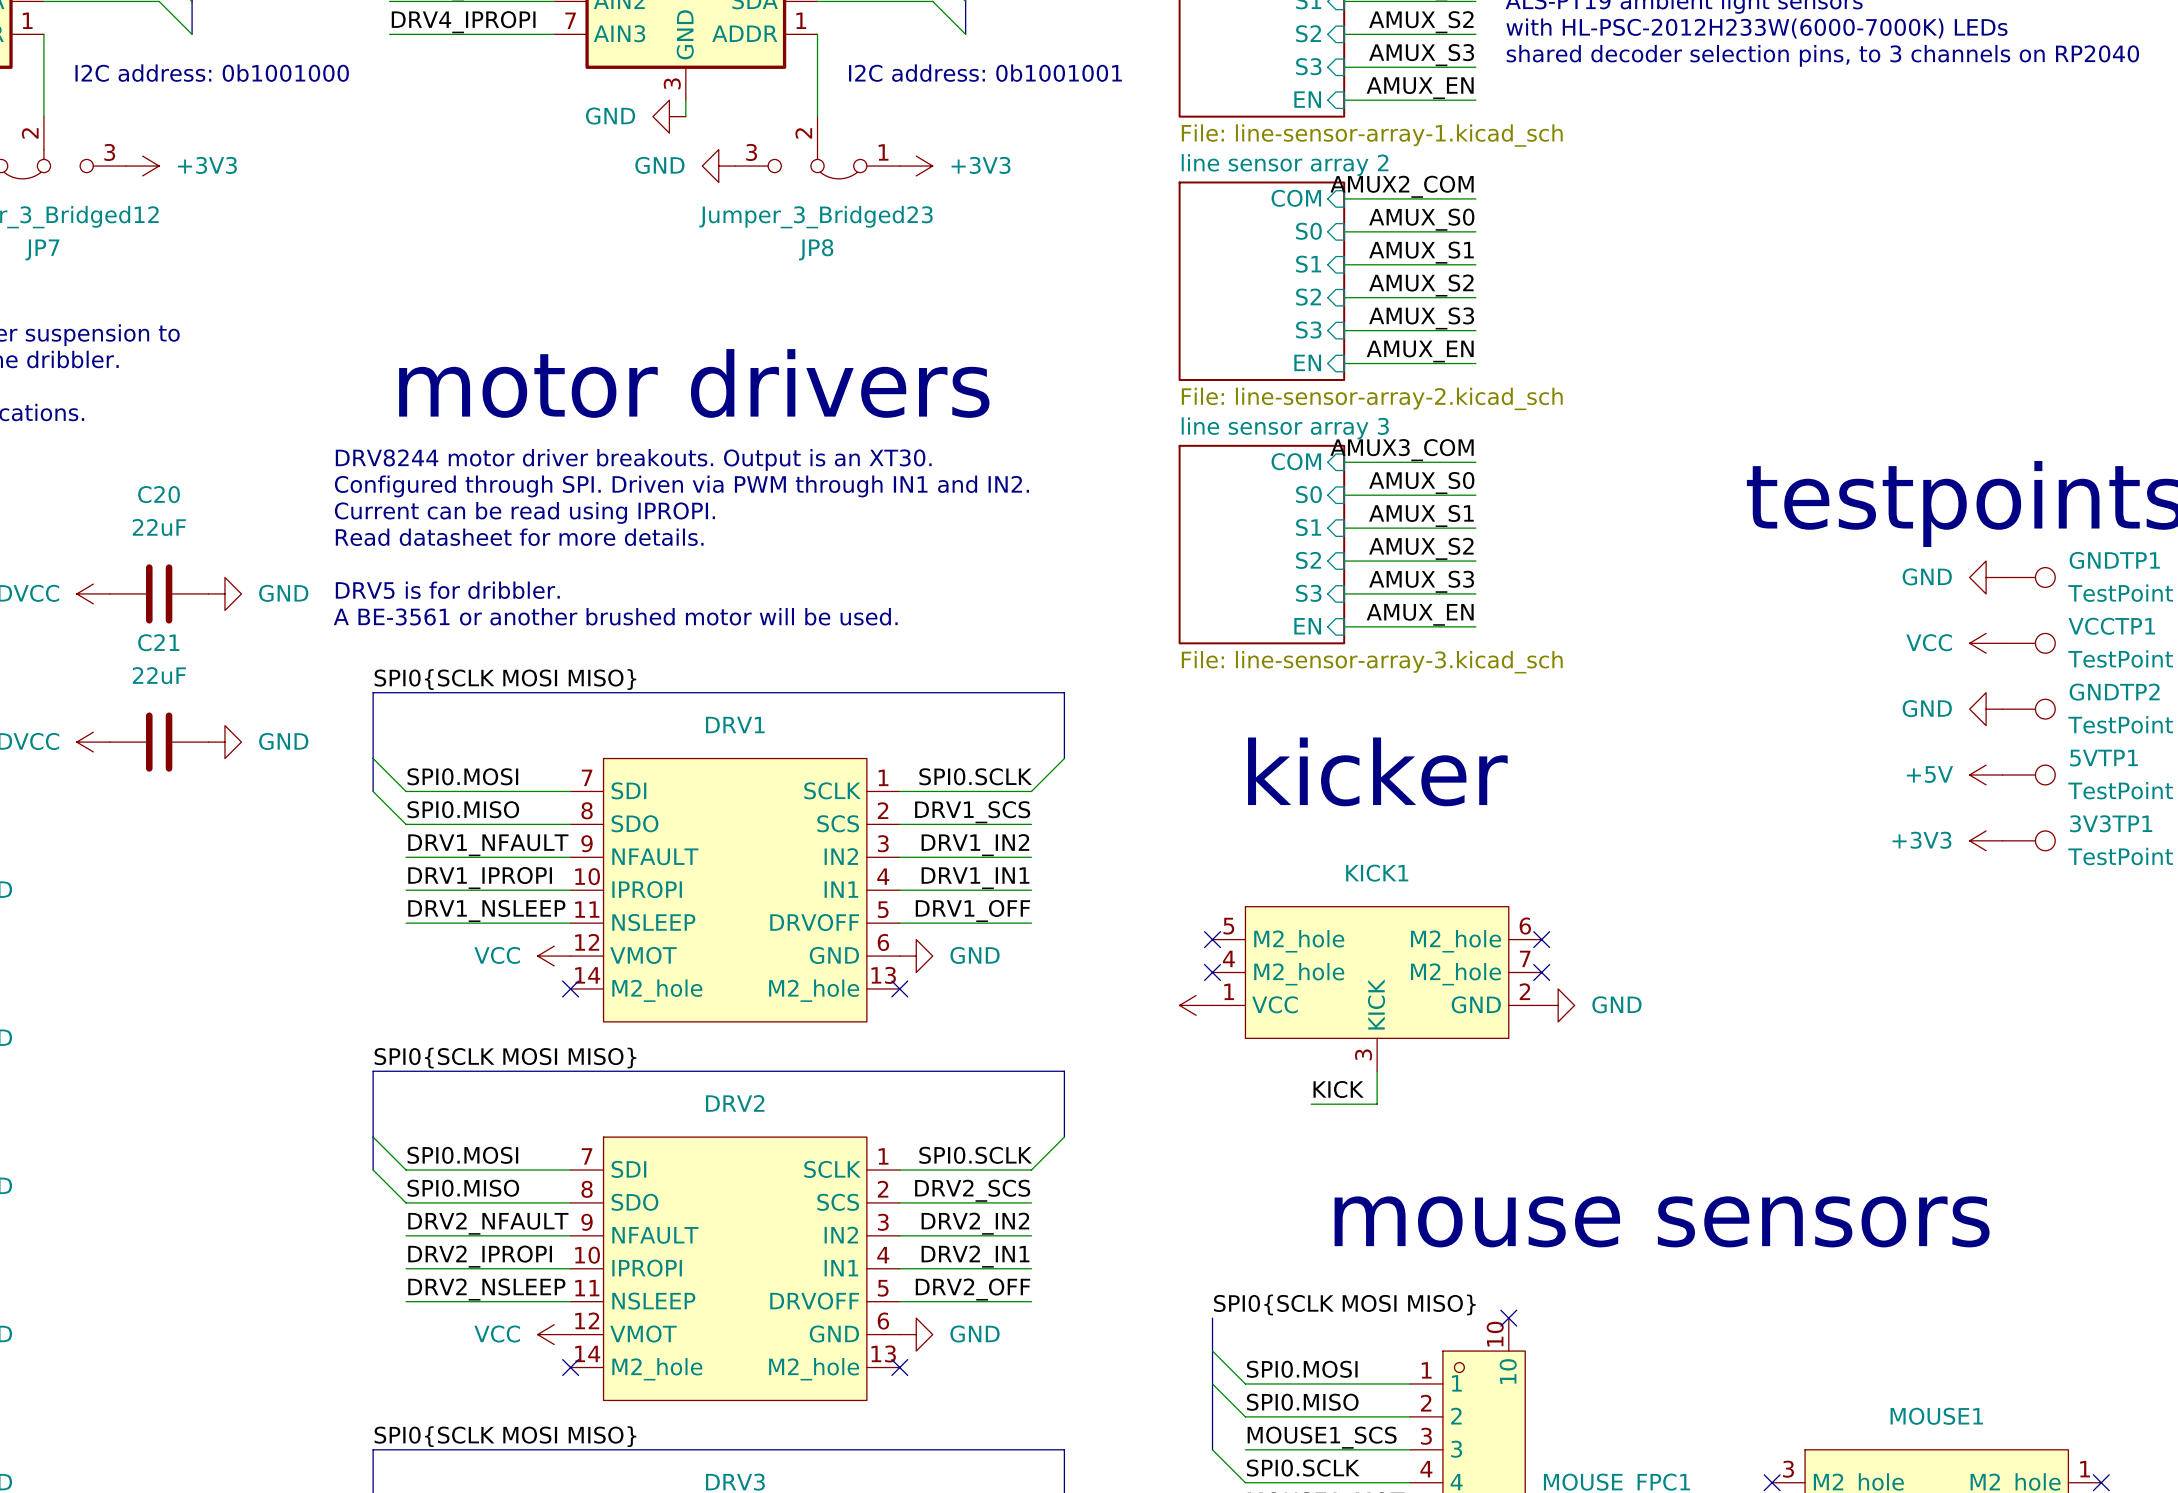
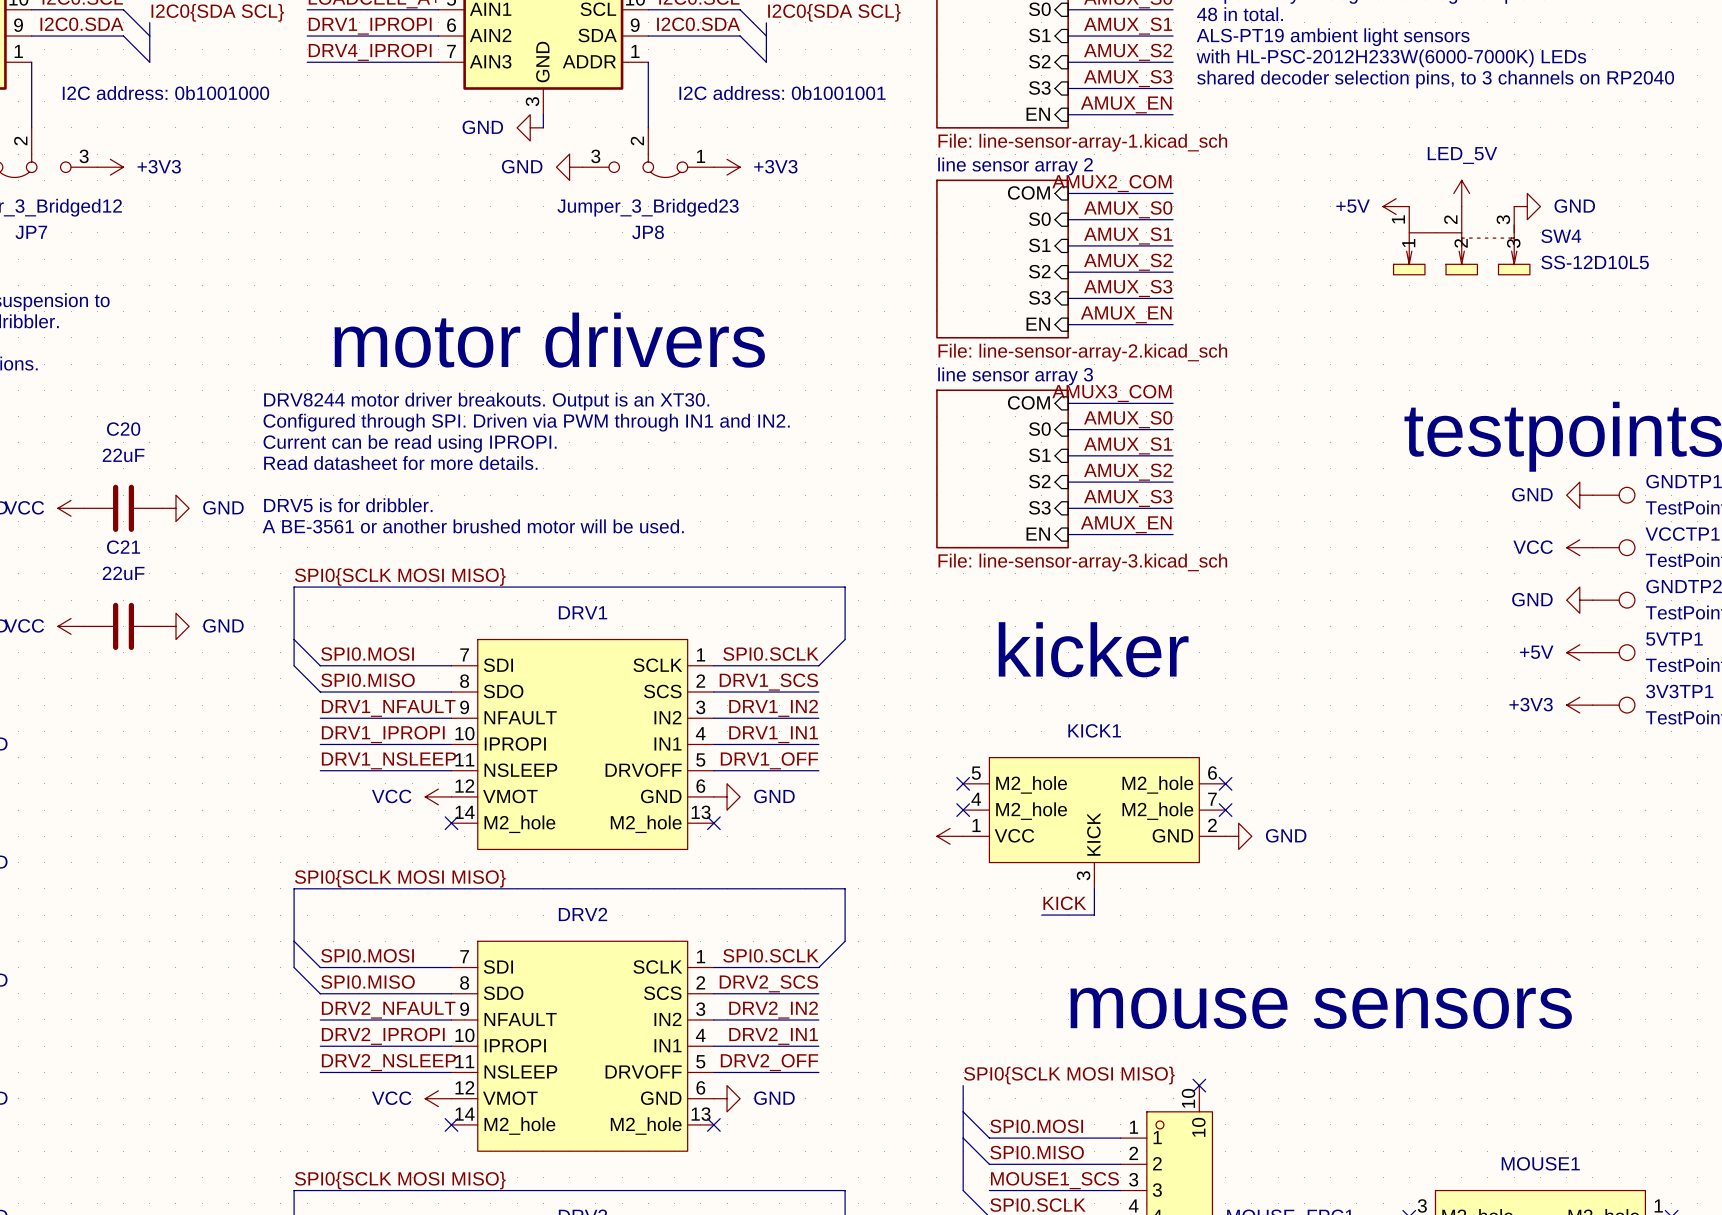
power symbol: none -> LED_5V (1461, 193)
power symbol: none -> +5V (1396, 206)
power symbol: none -> GND (1527, 206)
SW4: none -> SS-12D10L5 (1461, 240)

